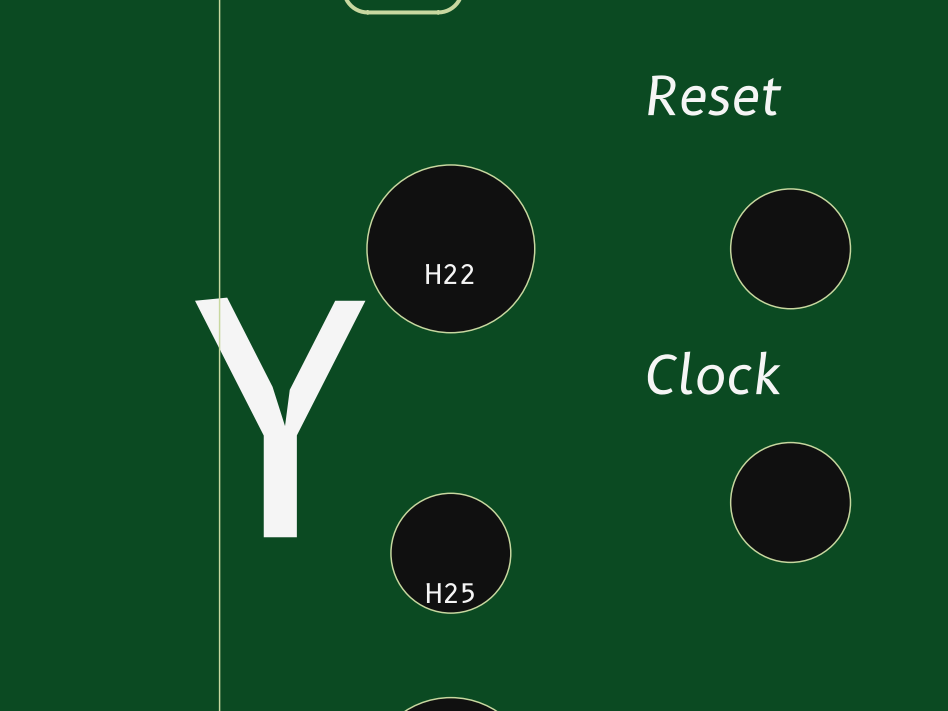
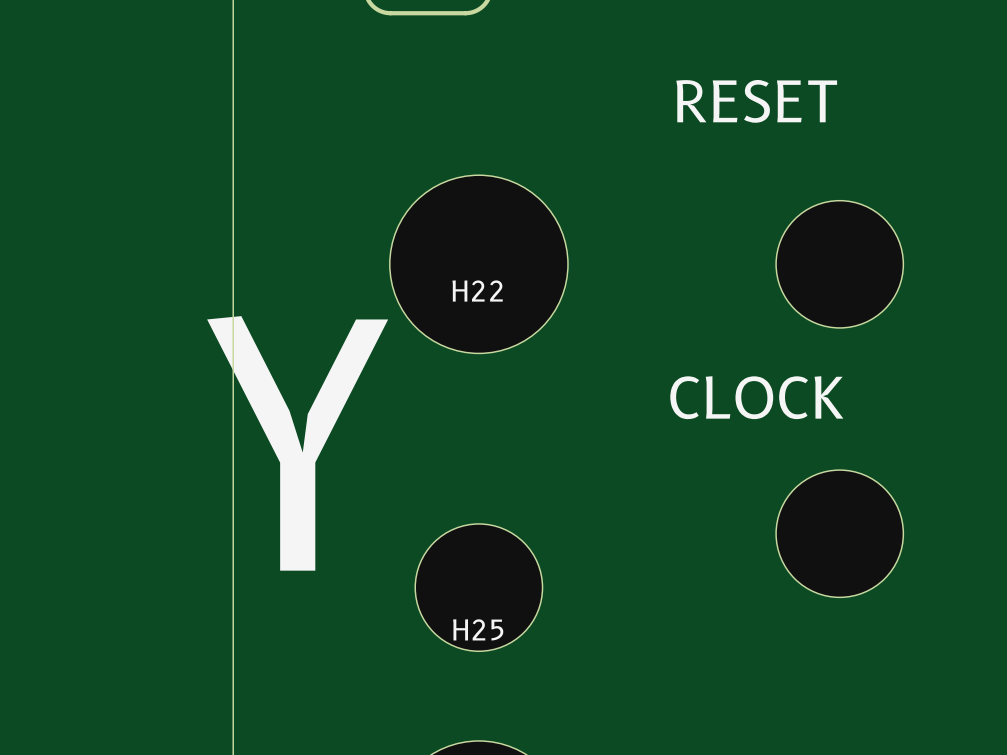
text: Reset (714, 95) -> RESET (756, 101)
text: Clock (714, 373) -> CLOCK (756, 397)

